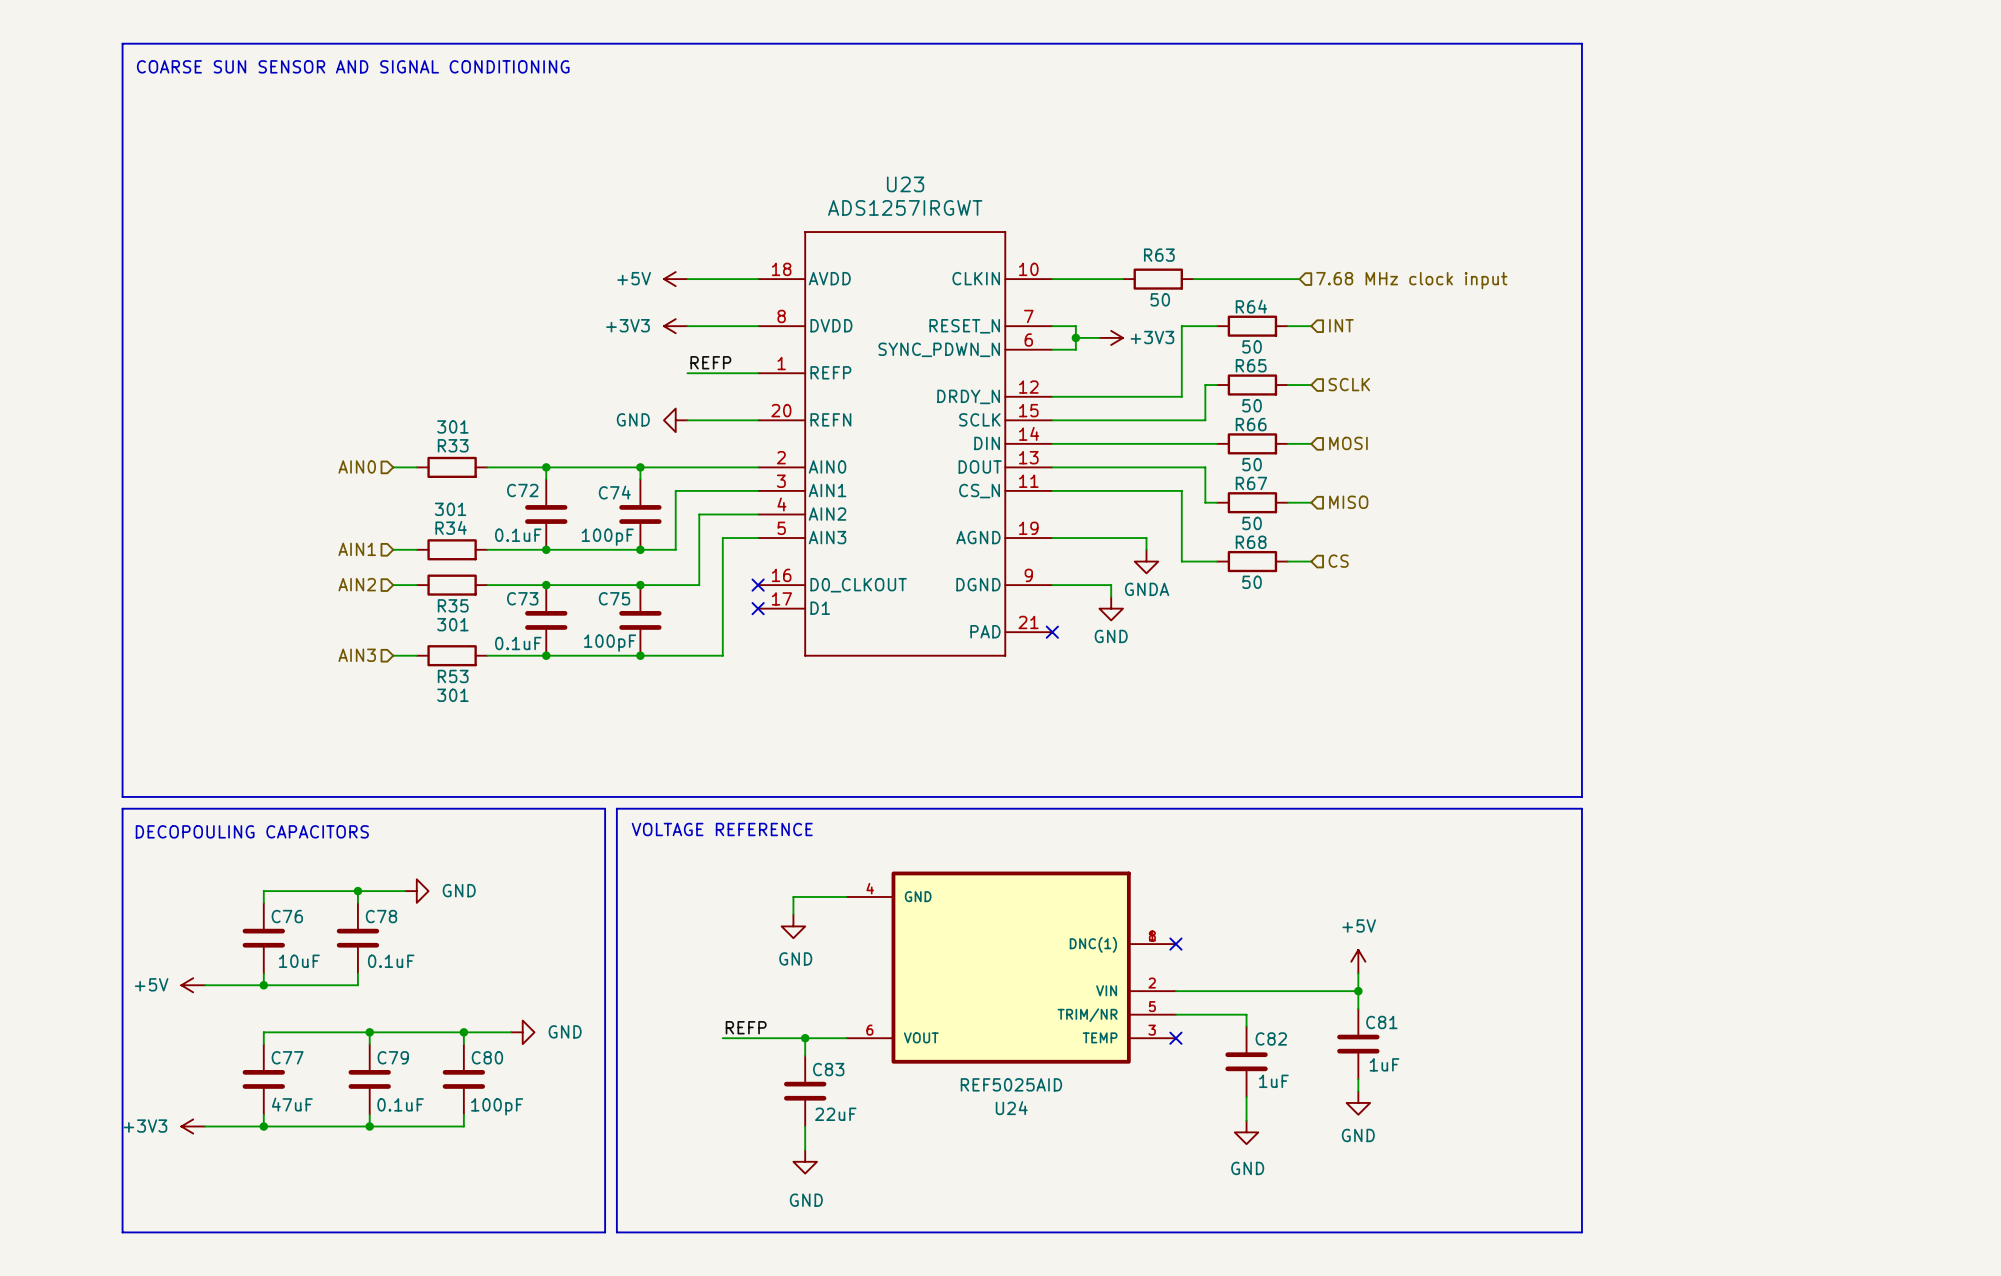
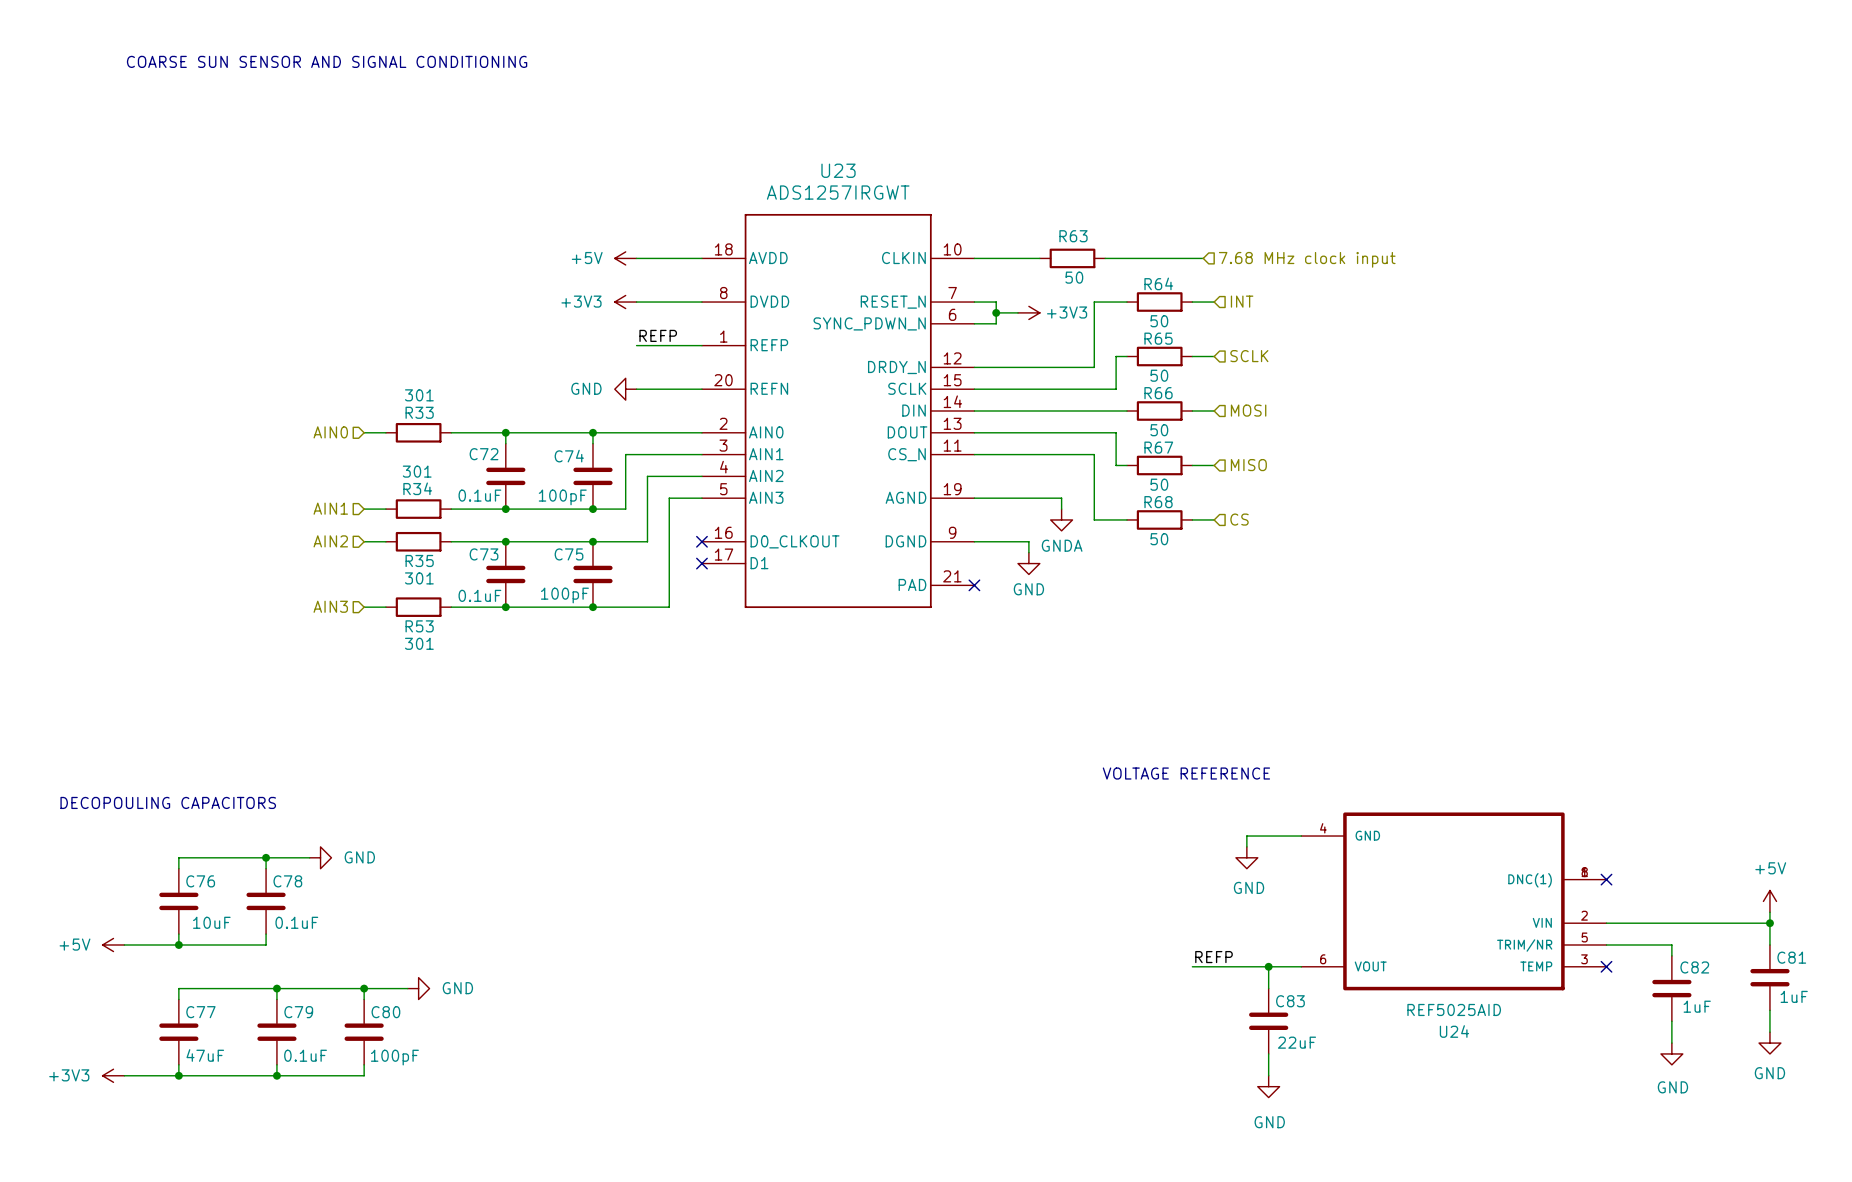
line: (122, 43) (122, 796) (1581, 796) (1581, 43) (122, 43) -> none
line: (122, 808) (605, 808) (605, 1232) (122, 1232) (122, 808) -> none
line: (616, 808) (1581, 808) (1581, 1232) (616, 1232) (616, 808) -> none
text: VOLTAGE REFERENCE (722, 829) -> none
text position: DECOPOULING CAPACITORS (252, 831) -> DECOPOULING CAPACITORS (168, 802)
text: none -> VOLTAGE REFERENCE (1186, 773)
U24 symbol: [846, 871, 1176, 1064] -> [1301, 812, 1607, 991]
wire: (357, 891) (357, 902) -> (266, 857) (266, 868)
junction: (357, 891) -> none
wire: (405, 891) (263, 891) (263, 902) -> (309, 857) (178, 857) (178, 868)
power symbol position: GND (416, 891) -> GND (320, 857)
wire: (846, 896) (793, 896) (793, 914) -> none
wire: none -> (1301, 836) (1246, 836) (1246, 846)
junction: none -> (266, 857)
power symbol: GND (793, 926) -> none
power symbol: none -> GND (1246, 857)
C76 position: (263, 938) -> (178, 901)
C78 position: (357, 938) -> (266, 901)
no-connect mark: (1175, 944) -> none
no-connect mark: none -> (1606, 879)
power symbol: +5V (1358, 961) -> none
wire: (263, 973) (263, 985) -> (178, 934) (178, 944)
wire: (357, 973) (357, 985) (204, 985) -> (266, 934) (266, 944) (124, 944)
wire: (1358, 973) (1358, 1008) -> none
power symbol: none -> +5V (1769, 901)
power symbol position: +5V (193, 985) -> +5V (113, 944)
junction: (263, 985) -> none
wire: none -> (1769, 912) (1769, 944)
wire: (1175, 991) (1358, 991) -> none
junction position: (1358, 991) -> (1268, 966)
wire: none -> (1606, 923) (1769, 923)
junction: none -> (1769, 923)
wire: (1175, 1014) (1246, 1014) (1246, 1026) -> none
junction: none -> (178, 944)
wire: none -> (1606, 944) (1671, 944) (1671, 955)
label: REFP (746, 1027) -> none
wire: (369, 1032) (369, 1044) -> (276, 988) (276, 999)
junction: (369, 1032) -> none
wire: (463, 1032) (463, 1044) -> (364, 988) (364, 999)
junction: (463, 1032) -> none
wire: (510, 1032) (263, 1032) (263, 1044) -> (407, 988) (178, 988) (178, 999)
power symbol position: GND (522, 1032) -> GND (418, 988)
label: none -> REFP (1213, 957)
wire: (722, 1038) (846, 1038) -> none
wire: (805, 1038) (805, 1055) -> none
junction: (805, 1038) -> none
no-connect mark: (1175, 1038) -> none
wire: none -> (1192, 966) (1301, 966)
C81 position: (1358, 1044) -> (1769, 977)
wire: none -> (1268, 966) (1268, 988)
no-connect mark: none -> (1606, 966)
C82 position: (1246, 1061) -> (1671, 988)
junction: none -> (276, 988)
junction: none -> (364, 988)
C77 position: (263, 1079) -> (178, 1032)
C79 position: (369, 1079) -> (276, 1032)
C80 position: (463, 1079) -> (364, 1032)
wire: (1358, 1079) (1358, 1091) -> none
C83 position: (805, 1091) -> (1268, 1021)
wire: none -> (1769, 1010) (1769, 1032)
wire: (1246, 1097) (1246, 1120) -> (1268, 1053) (1268, 1075)
power symbol: GND (1358, 1102) -> none
wire: none -> (1671, 1021) (1671, 1043)
wire: (263, 1114) (263, 1126) -> (178, 1064) (178, 1075)
wire: (369, 1114) (369, 1126) -> (276, 1064) (276, 1075)
wire: (463, 1114) (463, 1126) (204, 1126) -> (364, 1064) (364, 1075) (124, 1075)
power symbol position: +3V3 (193, 1126) -> +3V3 (113, 1075)
junction: (263, 1126) -> none
junction: (369, 1126) -> none
wire: (805, 1126) (805, 1150) -> none
power symbol: none -> GND (1769, 1043)
power symbol: GND (1246, 1132) -> none
power symbol: none -> GND (1671, 1053)
junction: none -> (178, 1075)
junction: none -> (276, 1075)
power symbol: GND (805, 1161) -> none
power symbol: none -> GND (1268, 1086)

